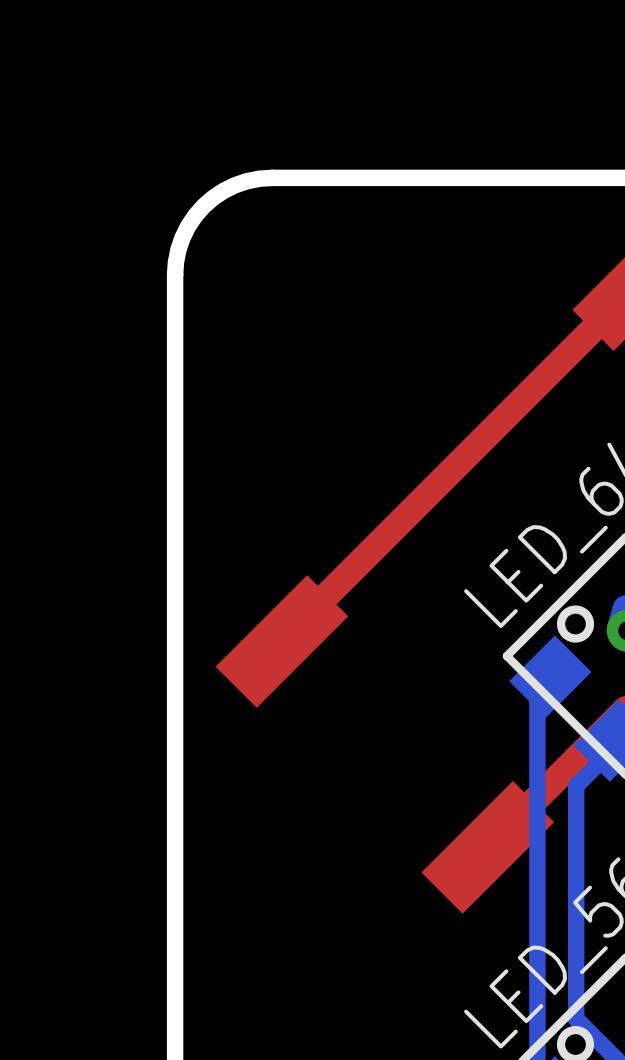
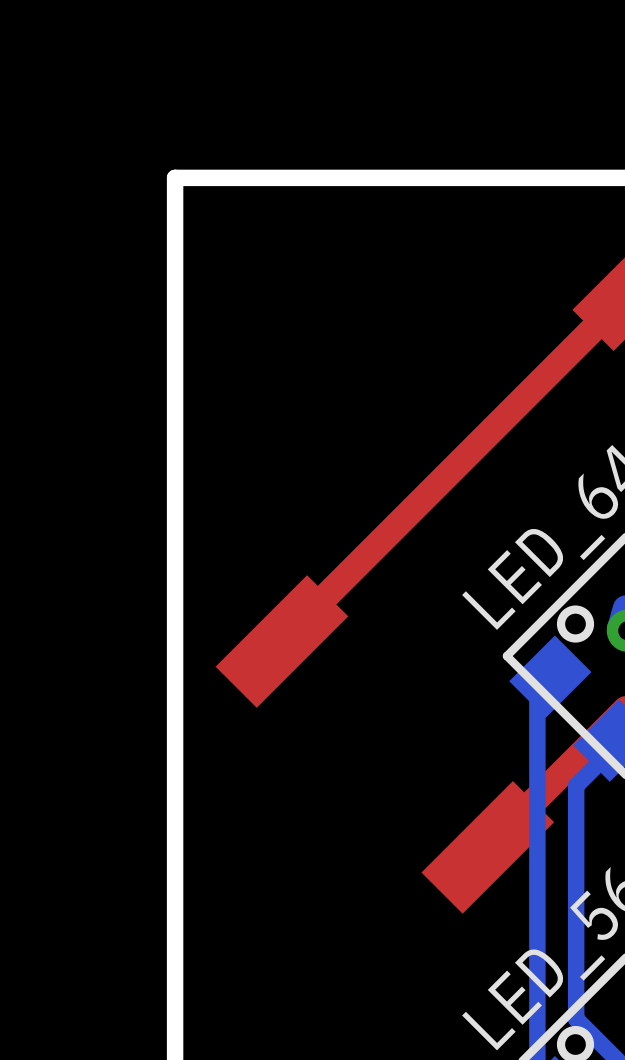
board edge: (272, 177) (259, 178) (235, 185) (223, 190) (203, 206) (188, 226) (182, 237) (175, 262) (175, 274) -> (272, 177) (175, 177) (175, 274)

